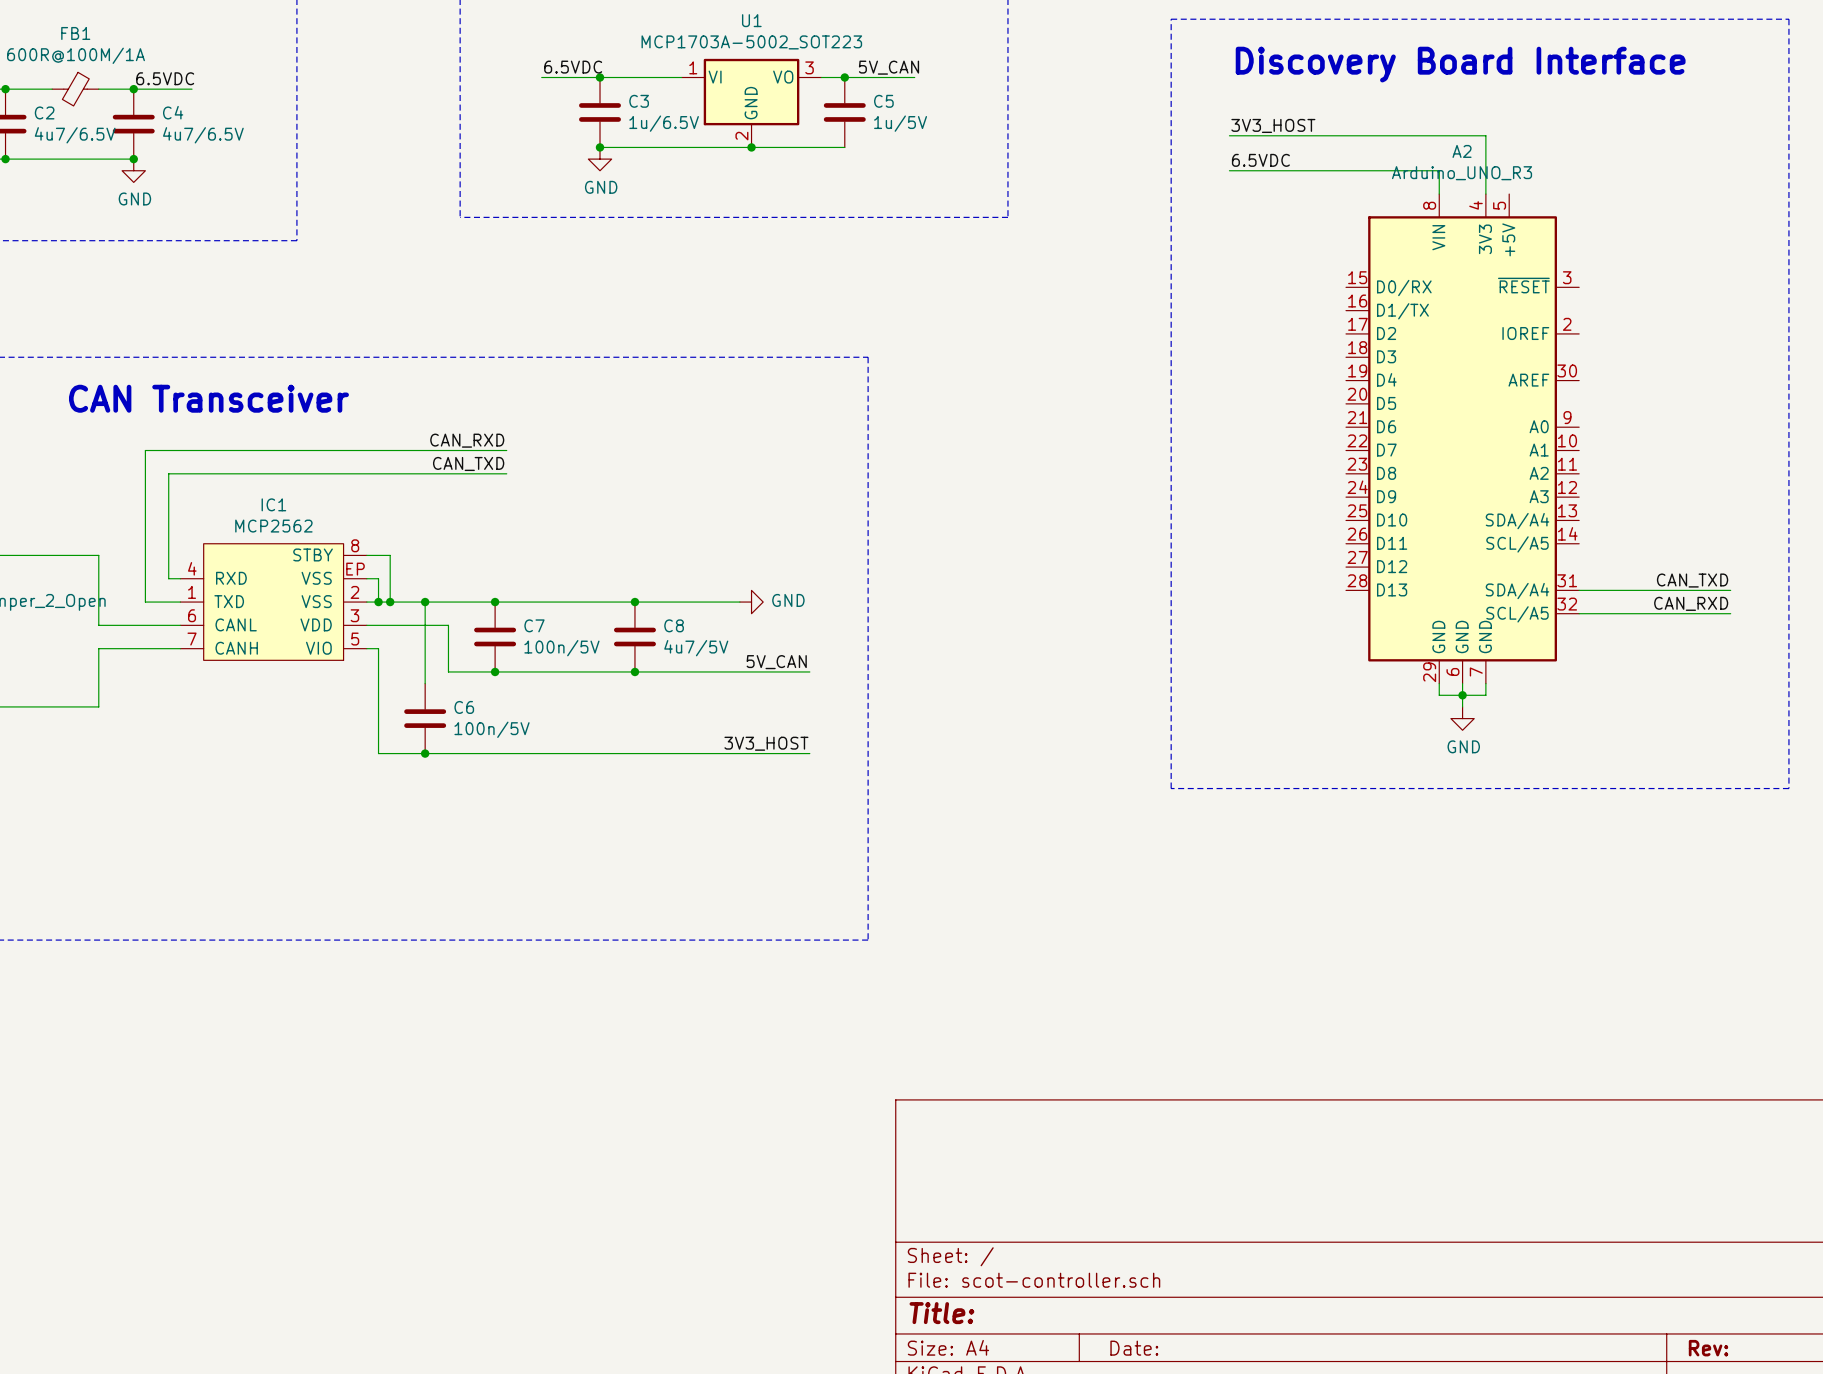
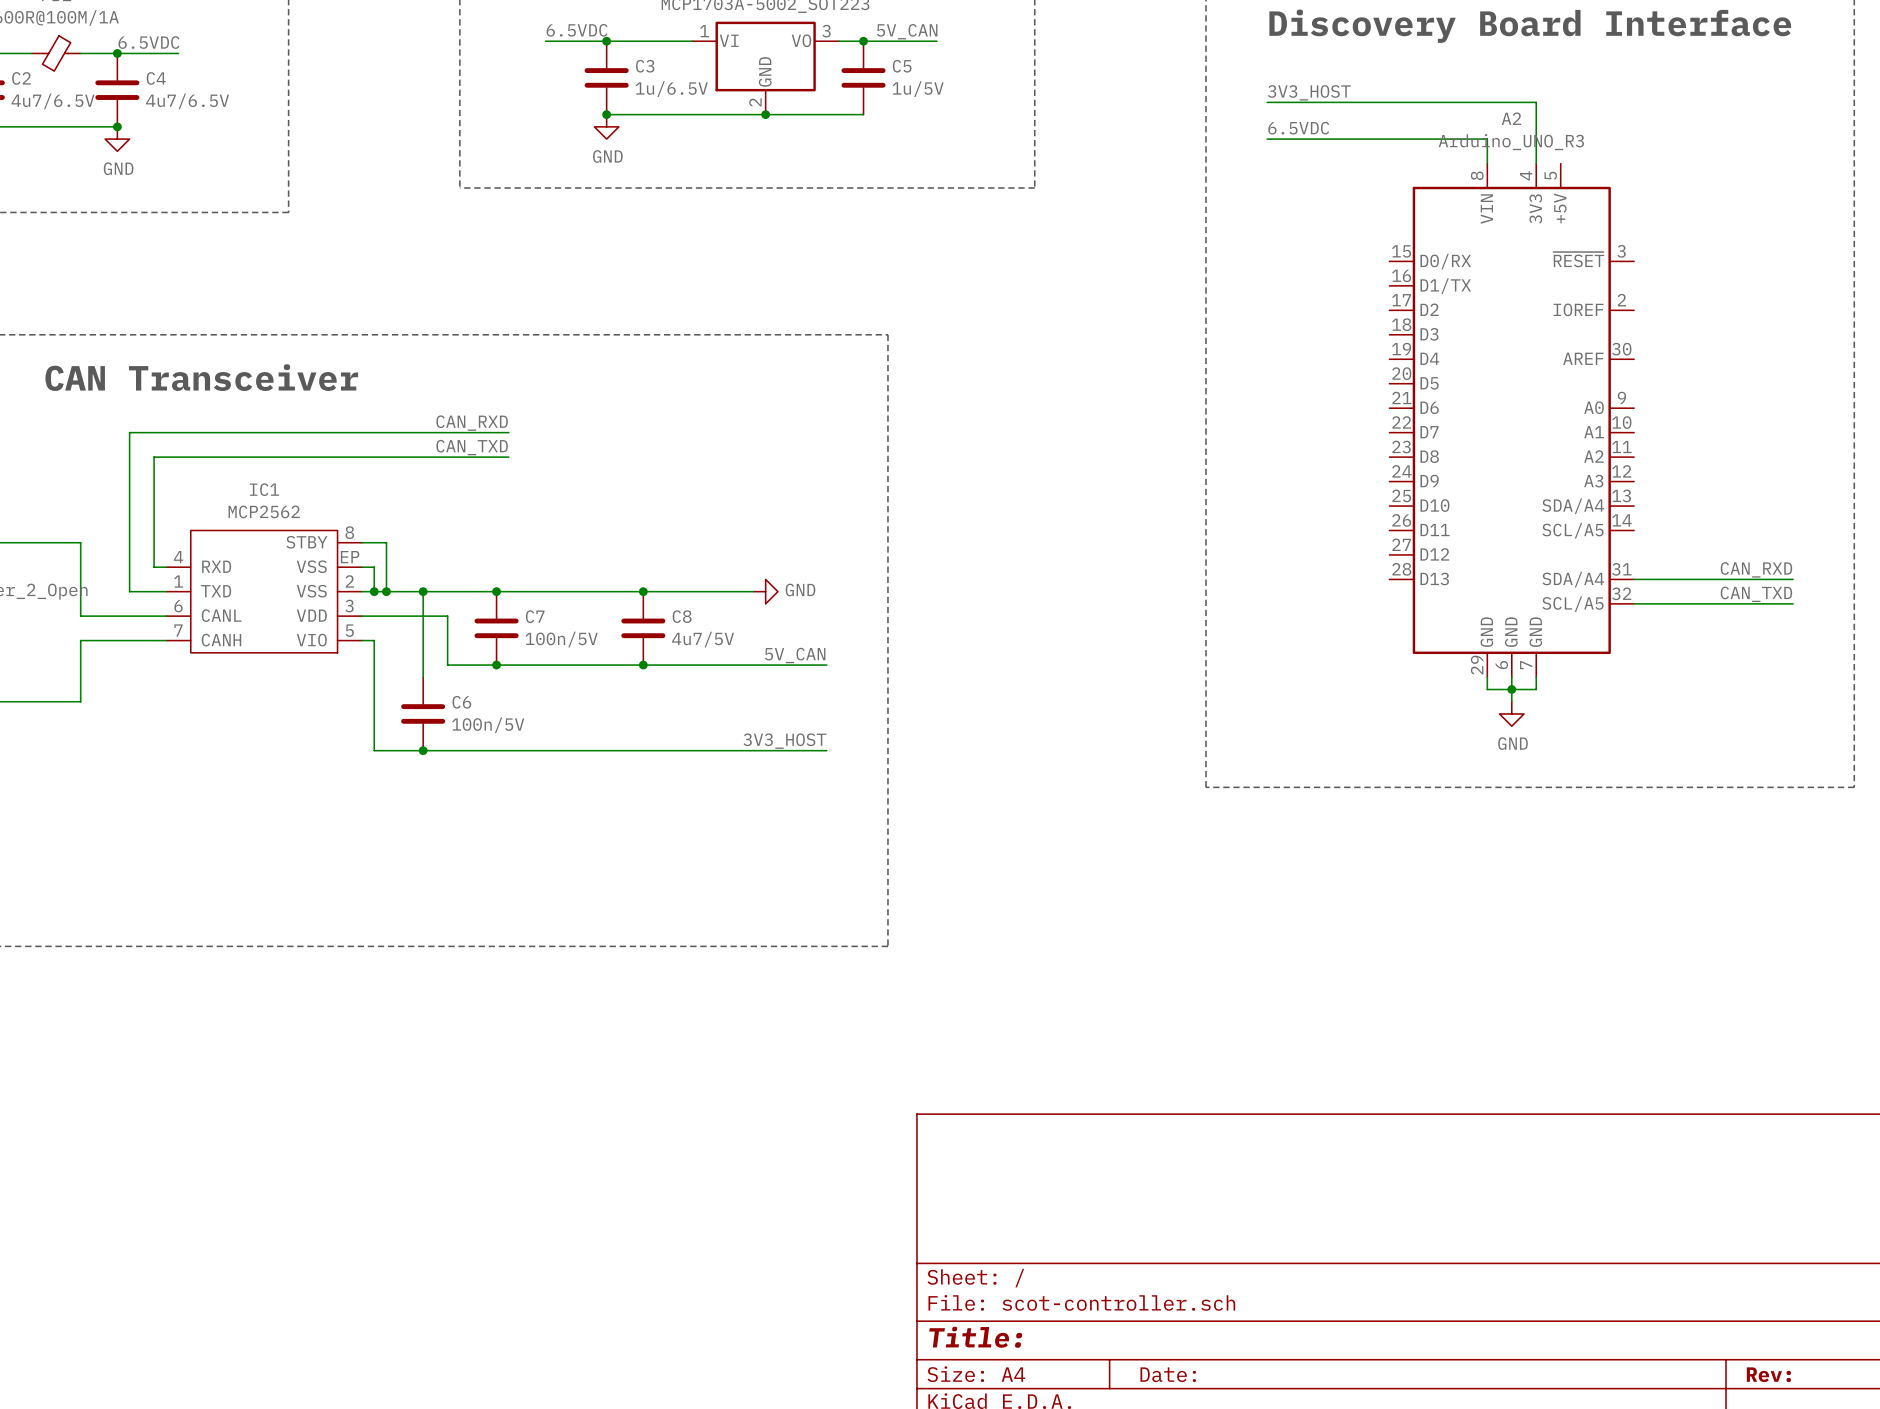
label: CAN_TXD (1692, 580) -> CAN_RXD (1756, 569)
label: CAN_RXD (1691, 603) -> CAN_TXD (1756, 594)

